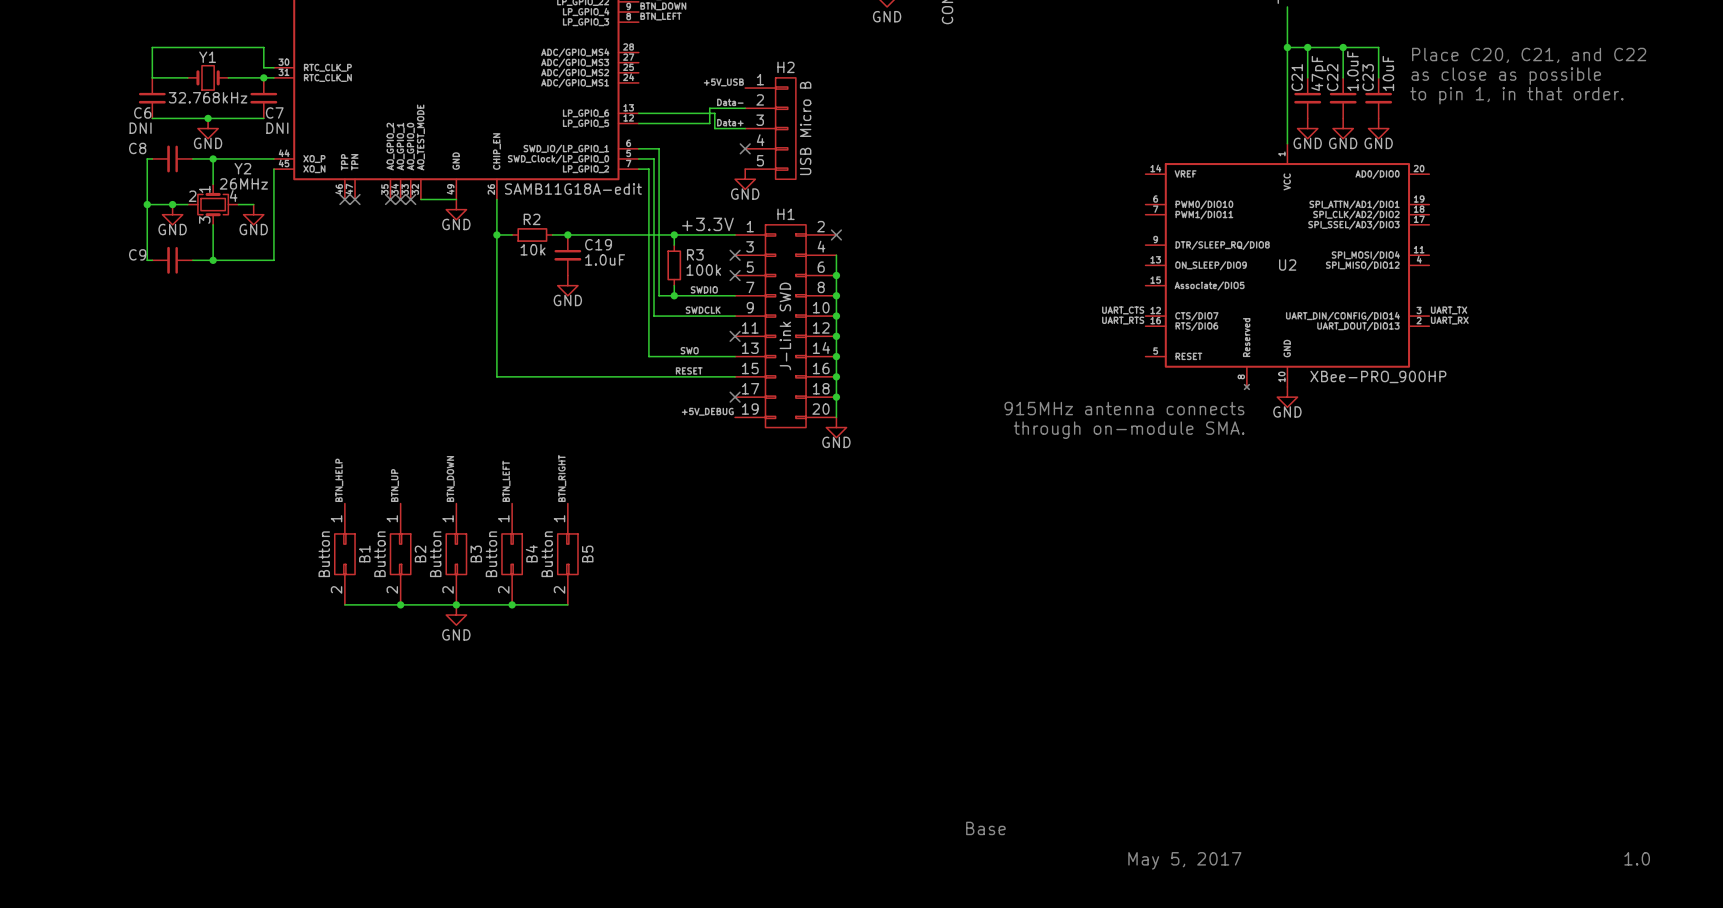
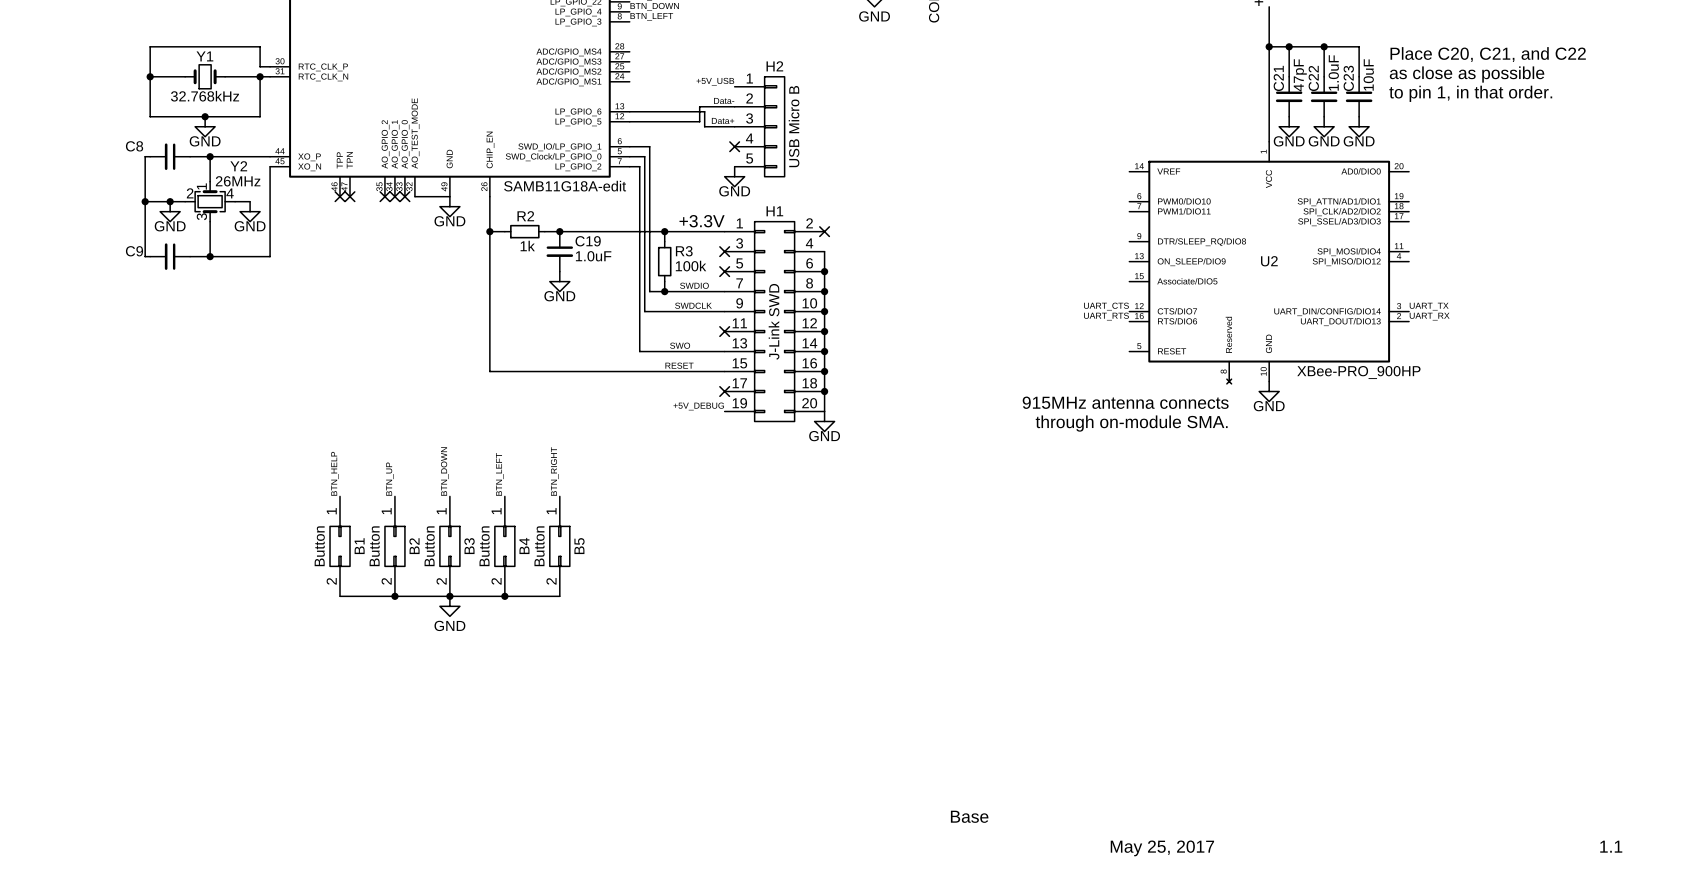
junction: none -> (150, 76)
C6: DNI (152, 98) -> none
C7: DNI (263, 98) -> none
R2 value: 10k (533, 249) -> 1k (527, 246)
text: 1.0 (1637, 858) -> 1.1 (1611, 846)
text: May 5, 2017 (1184, 860) -> May 25, 2017 (1162, 848)

